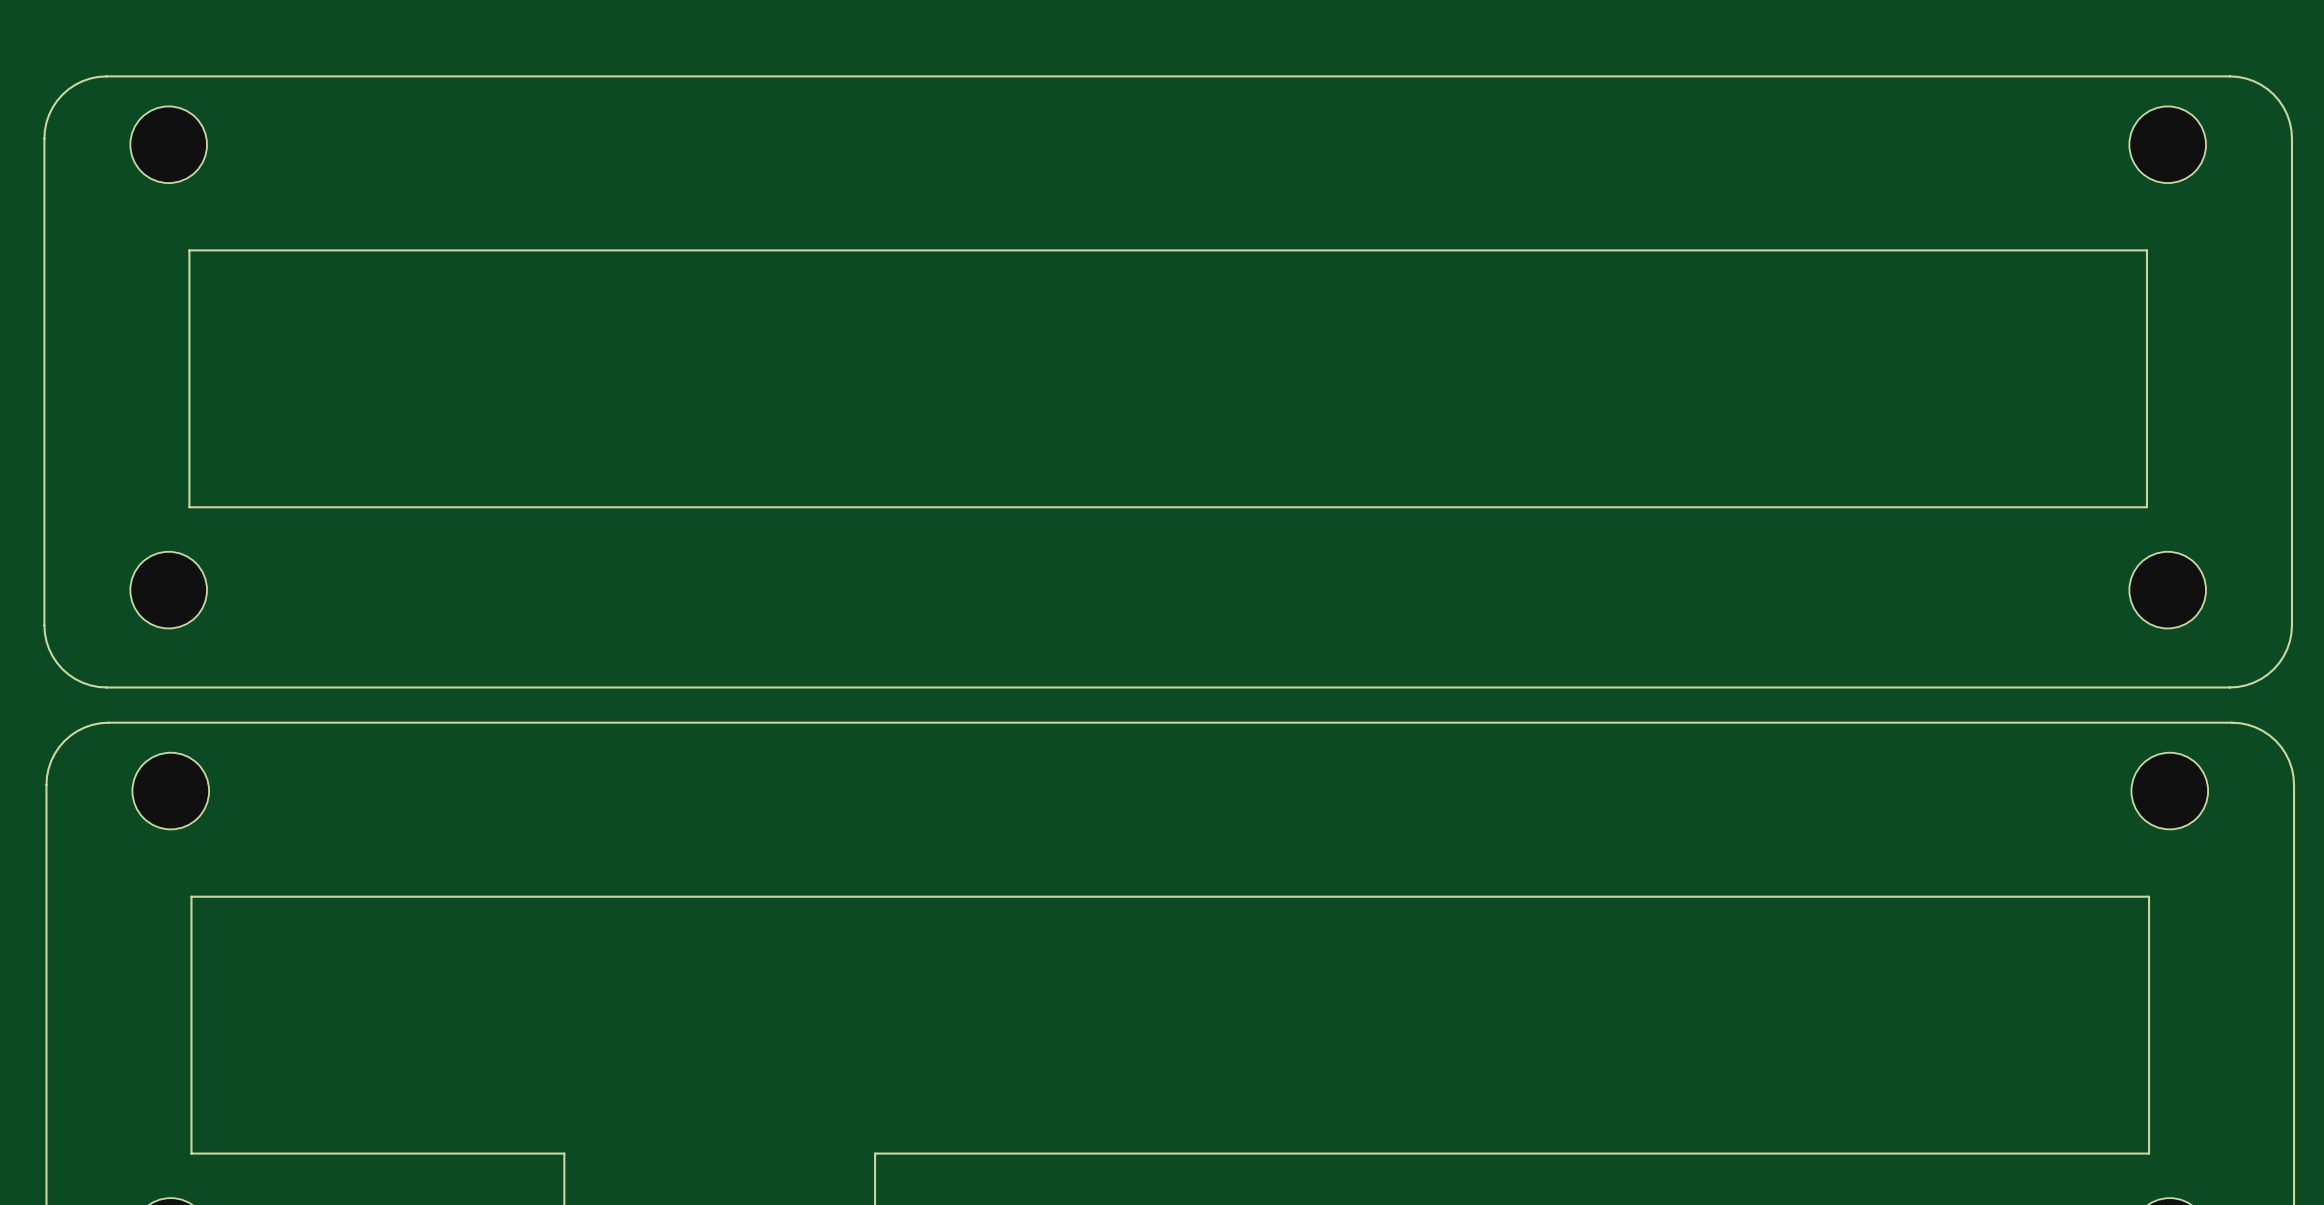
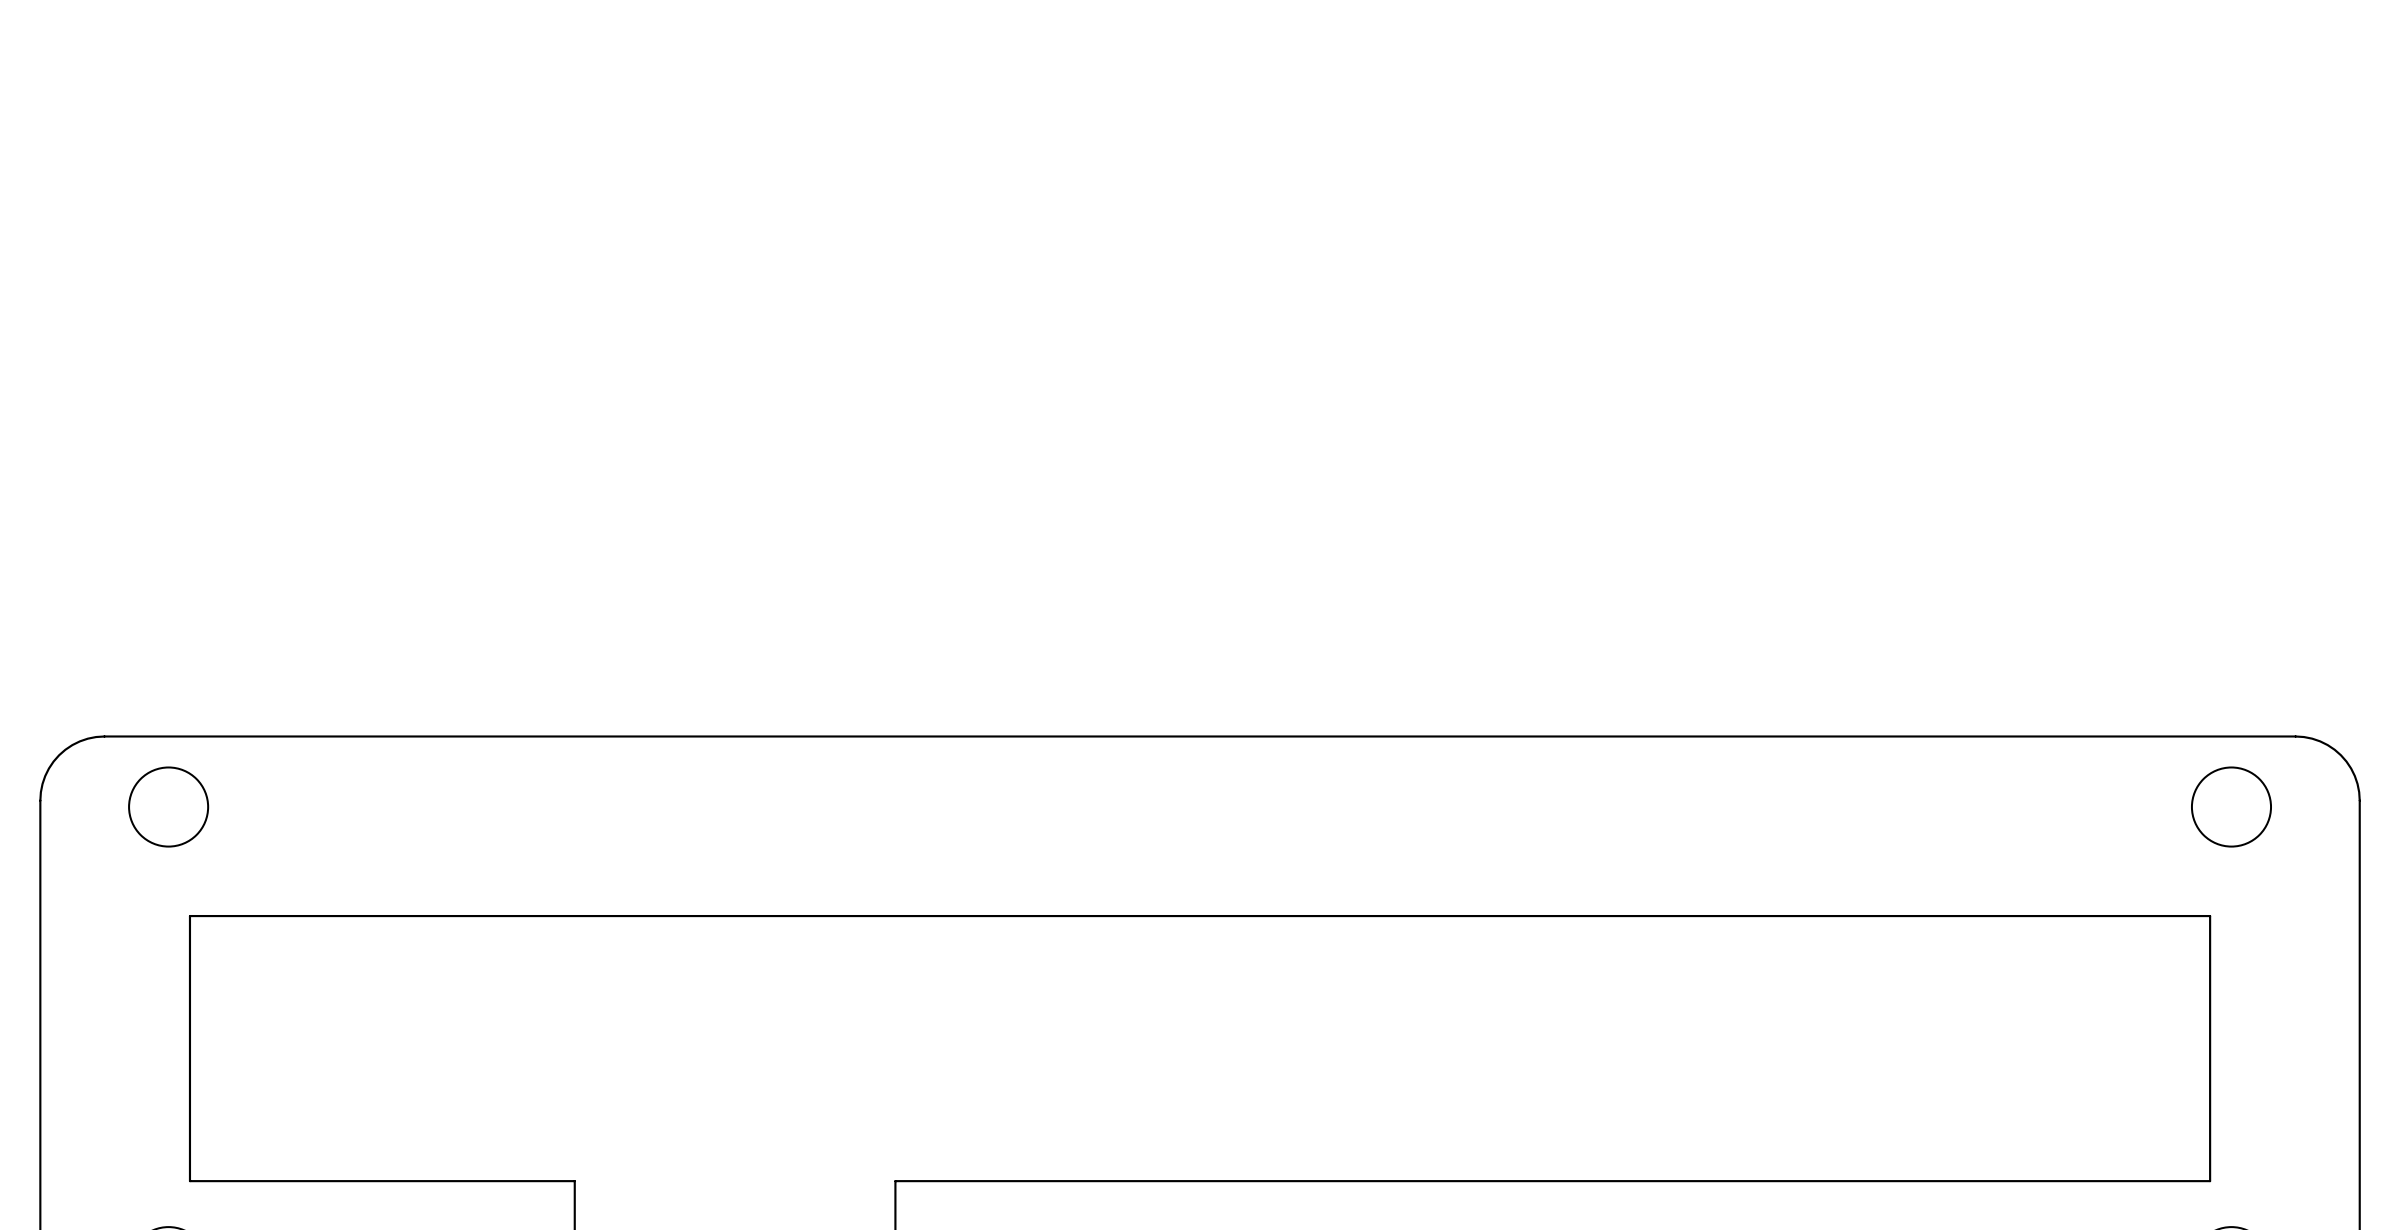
board edge: (2229, 76) (106, 76) (90, 78) (68, 89) (57, 100) (49, 114) (44, 130) (44, 625) (46, 641) (57, 663) (68, 674) (90, 685) (106, 687) (2229, 687) (2245, 685) (2267, 674) (2279, 663) (2287, 649) (2291, 633) (2291, 138) (2287, 114) (2273, 94) (2253, 81) (2229, 76) -> none
hole: (168, 144) -> none
hole: (2167, 144) -> none
board edge: (2146, 250) (189, 250) (189, 507) (2146, 507) (2146, 250) -> none
hole: (168, 590) -> none
hole: (2167, 590) -> none

